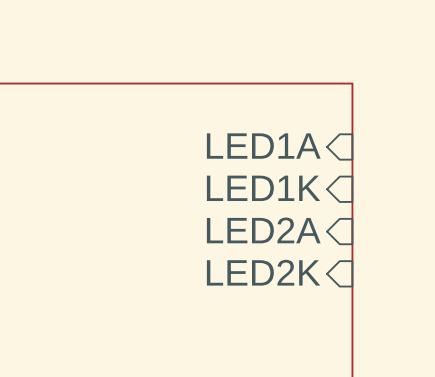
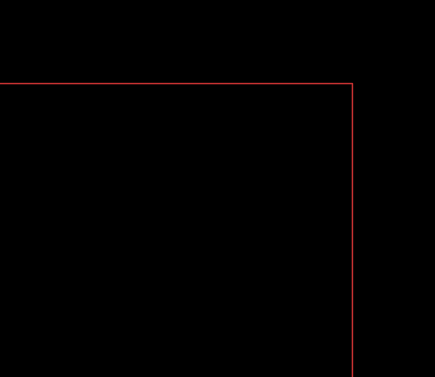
sheet pin: LED1A (263, 146) -> none
sheet pin: LED1K (263, 188) -> none
sheet pin: LED2A (263, 230) -> none
sheet pin: LED2K (263, 272) -> none

